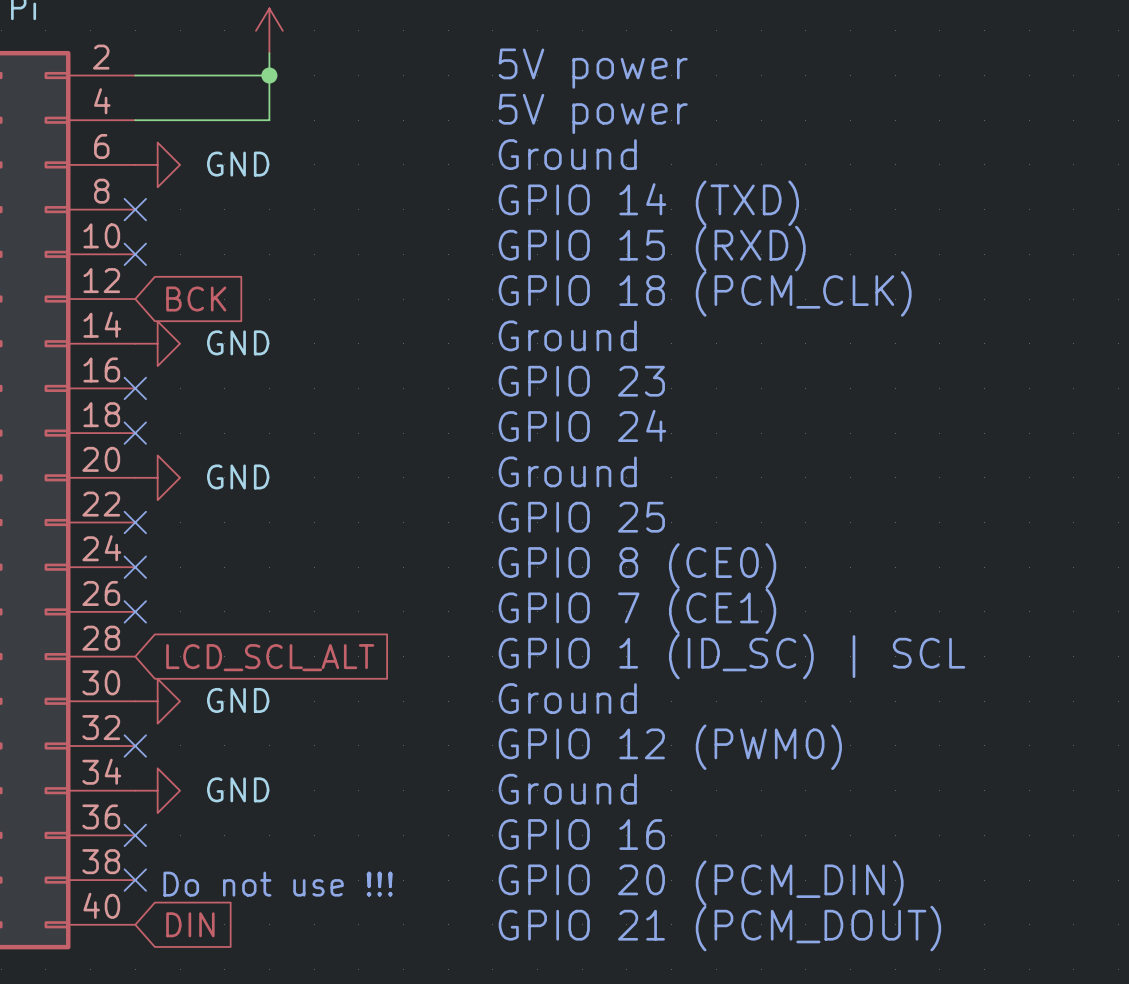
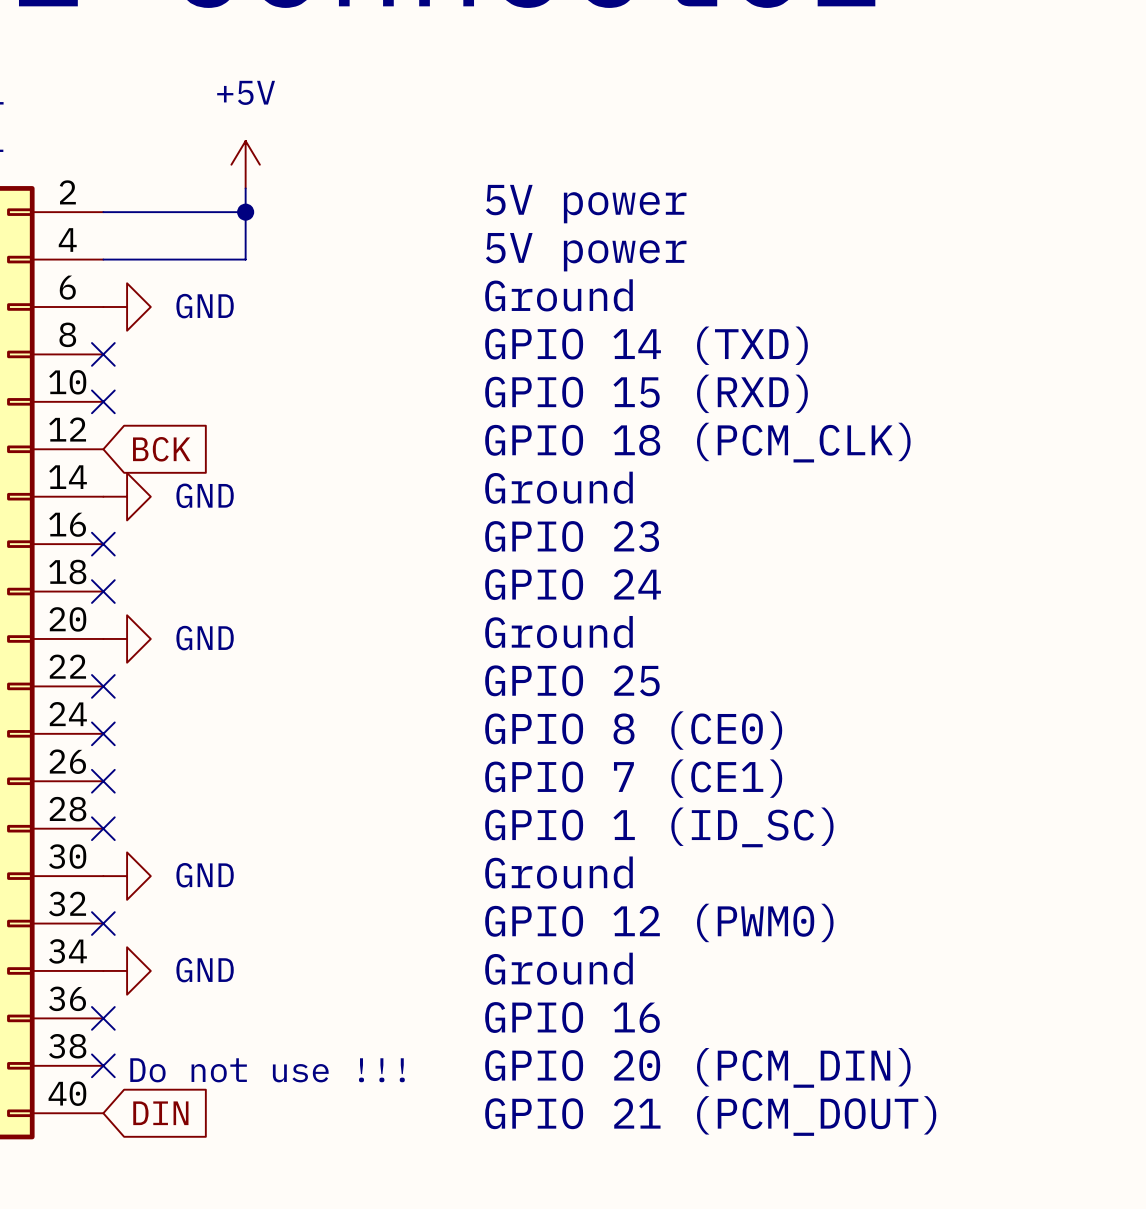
no-connect mark: none -> (103, 828)
text: GPIO 1 (ID_SC) | SCL (731, 656) -> GPIO 1 (ID_SC) (659, 827)
global label: LCD_SCL_ALT (270, 657) -> none

